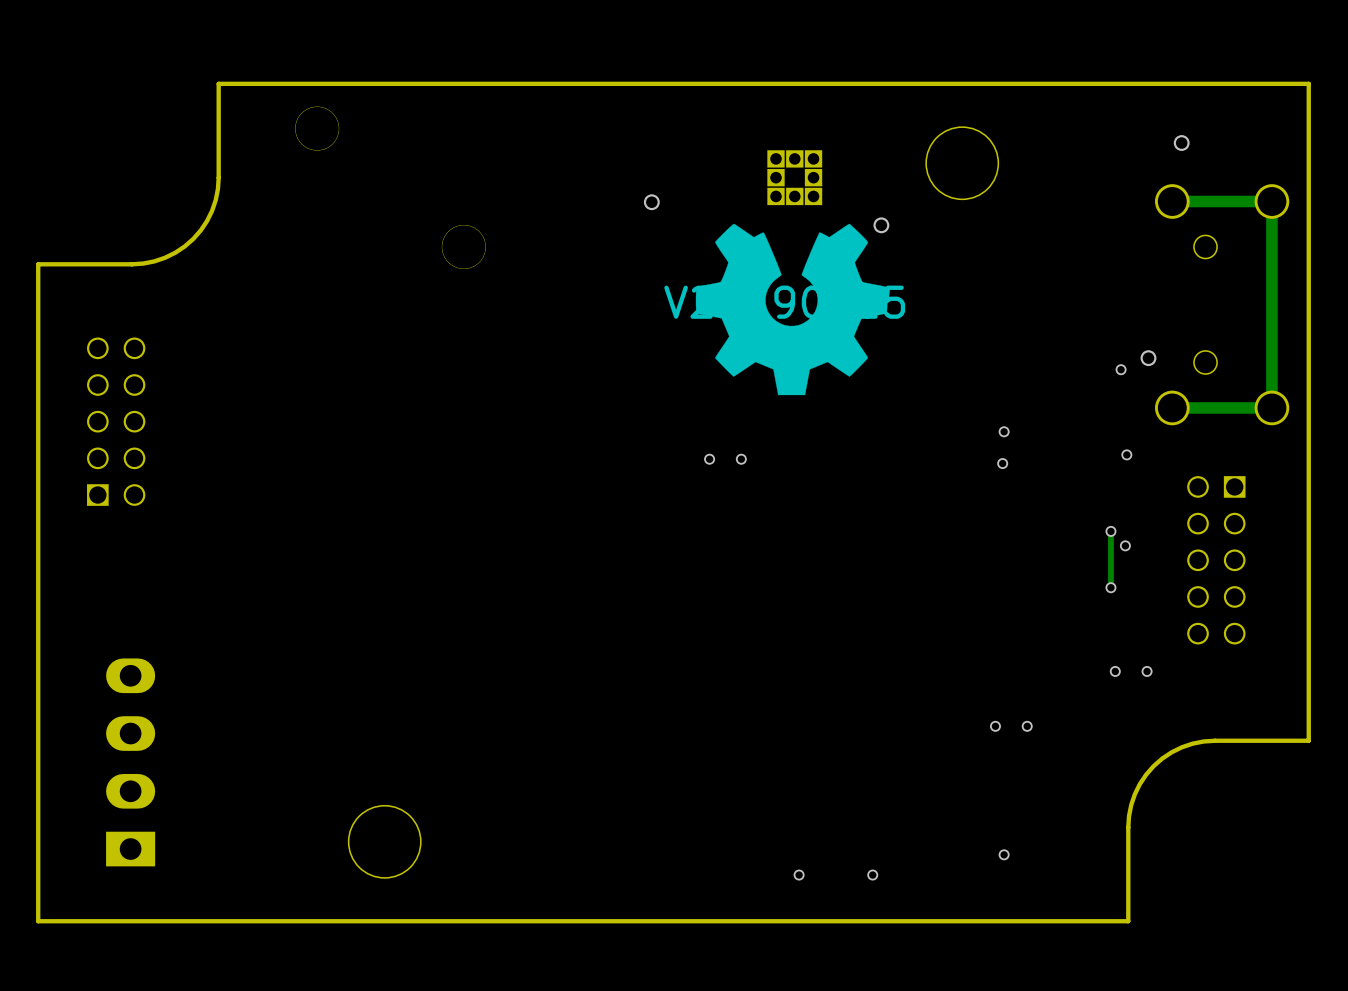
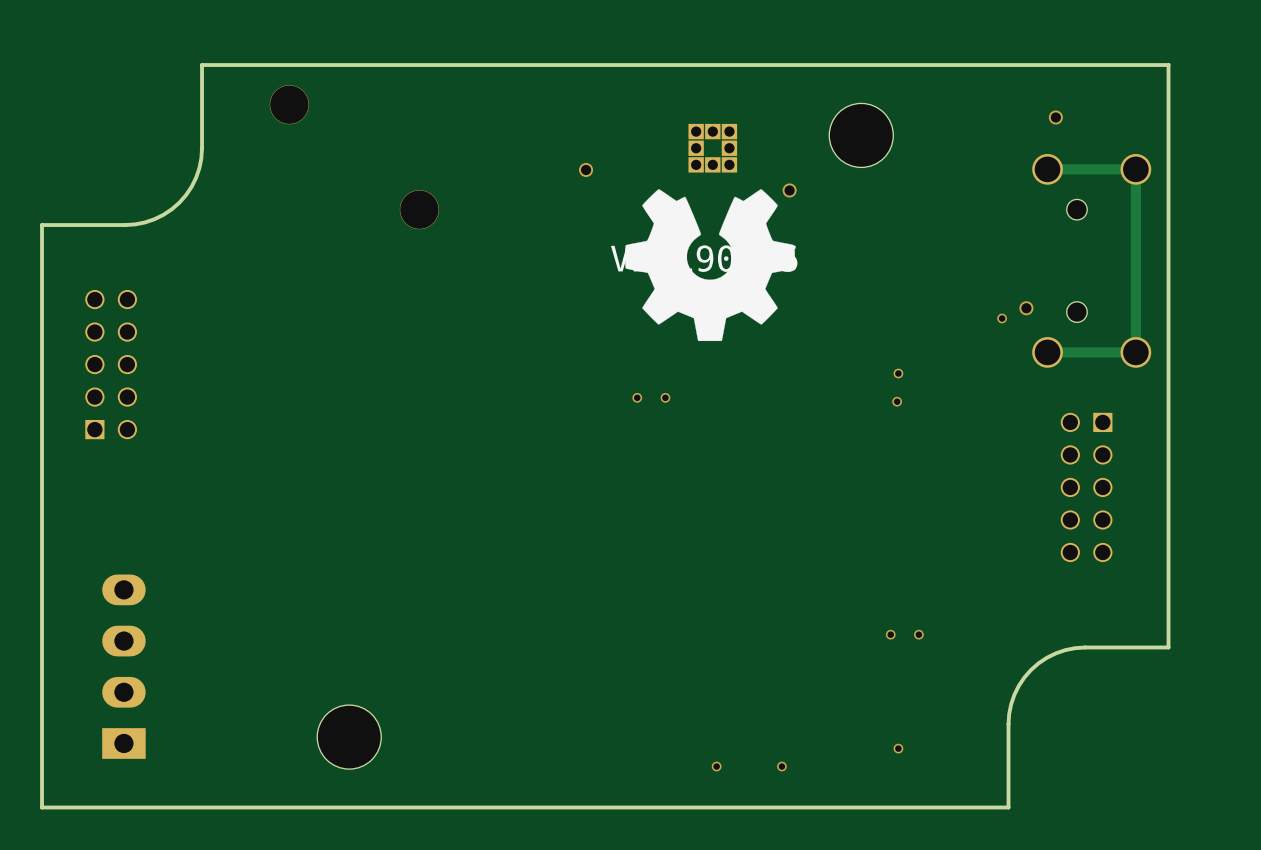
via: (1126, 454) -> none
track: (1110, 531) (1110, 587) -> none
via: (1110, 531) -> none
via: (1125, 545) -> none
via: (1110, 587) -> none
via: (1115, 671) -> none
via: (1147, 671) -> none

